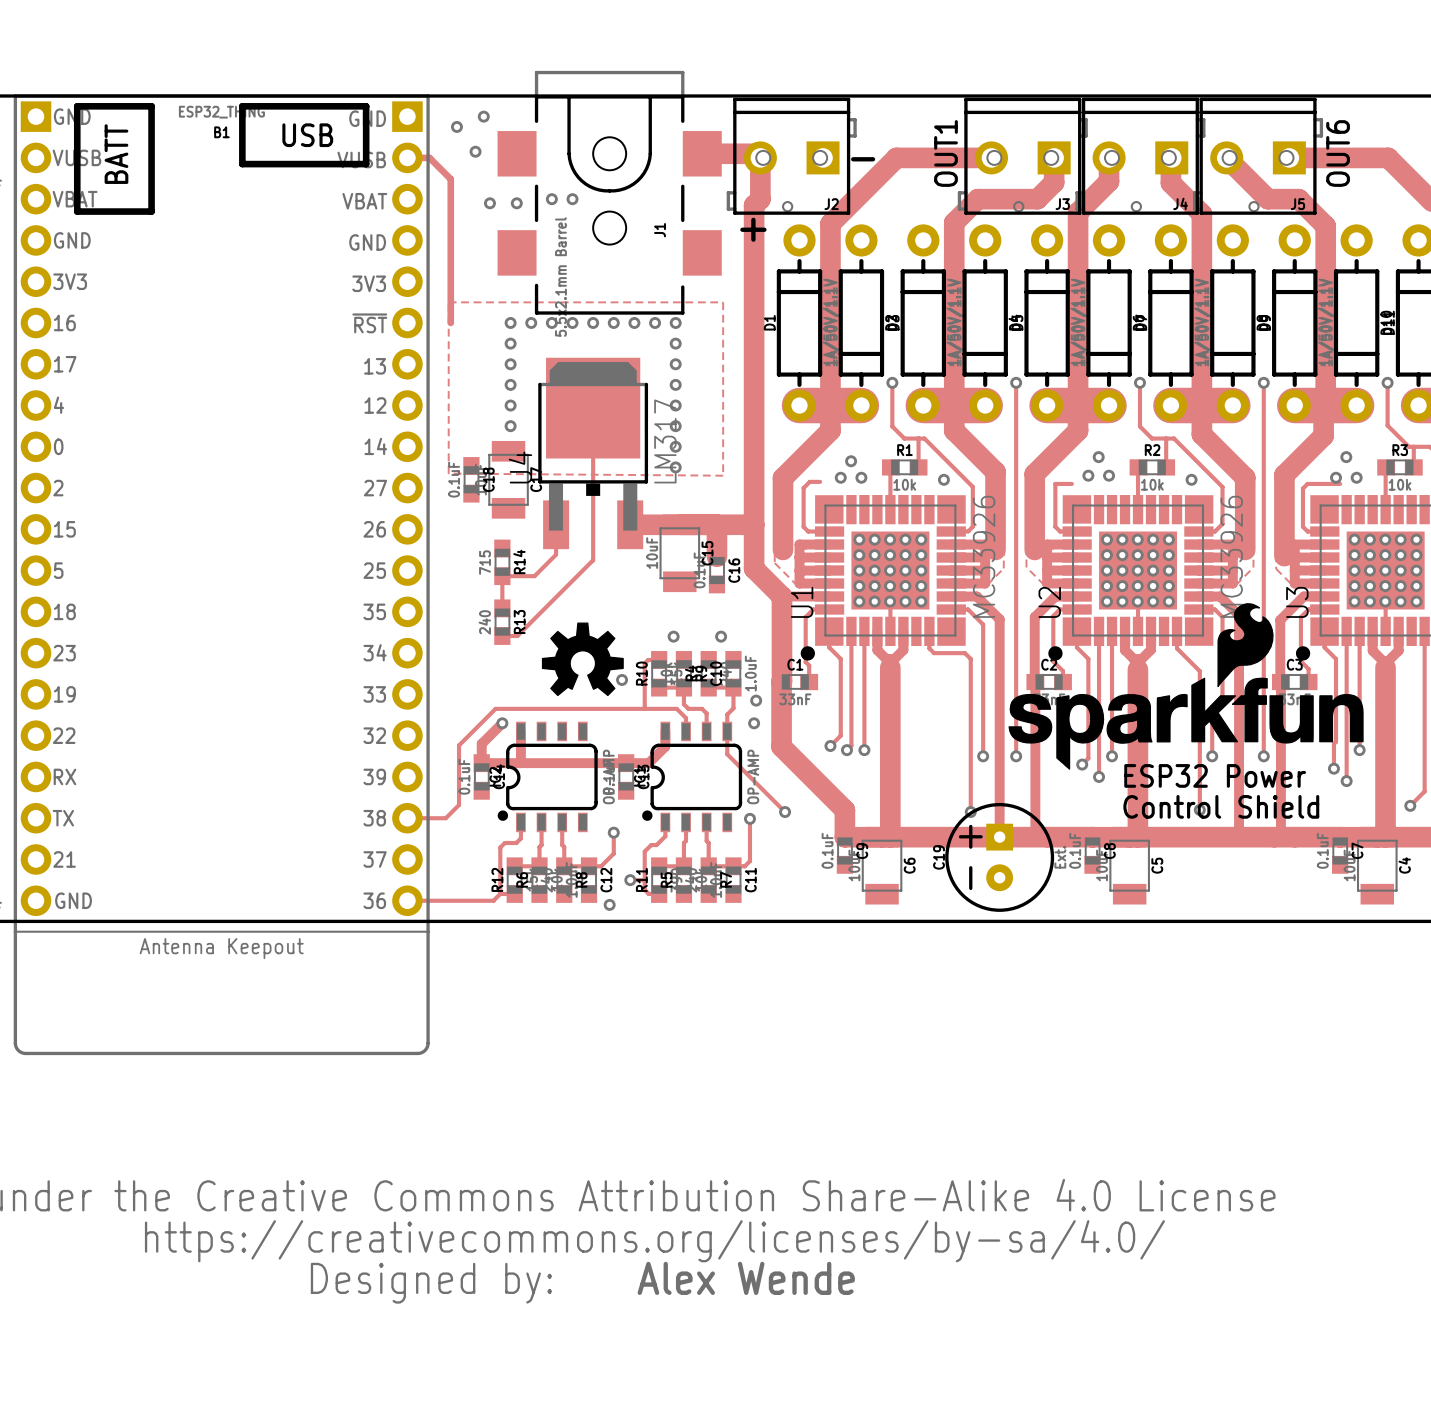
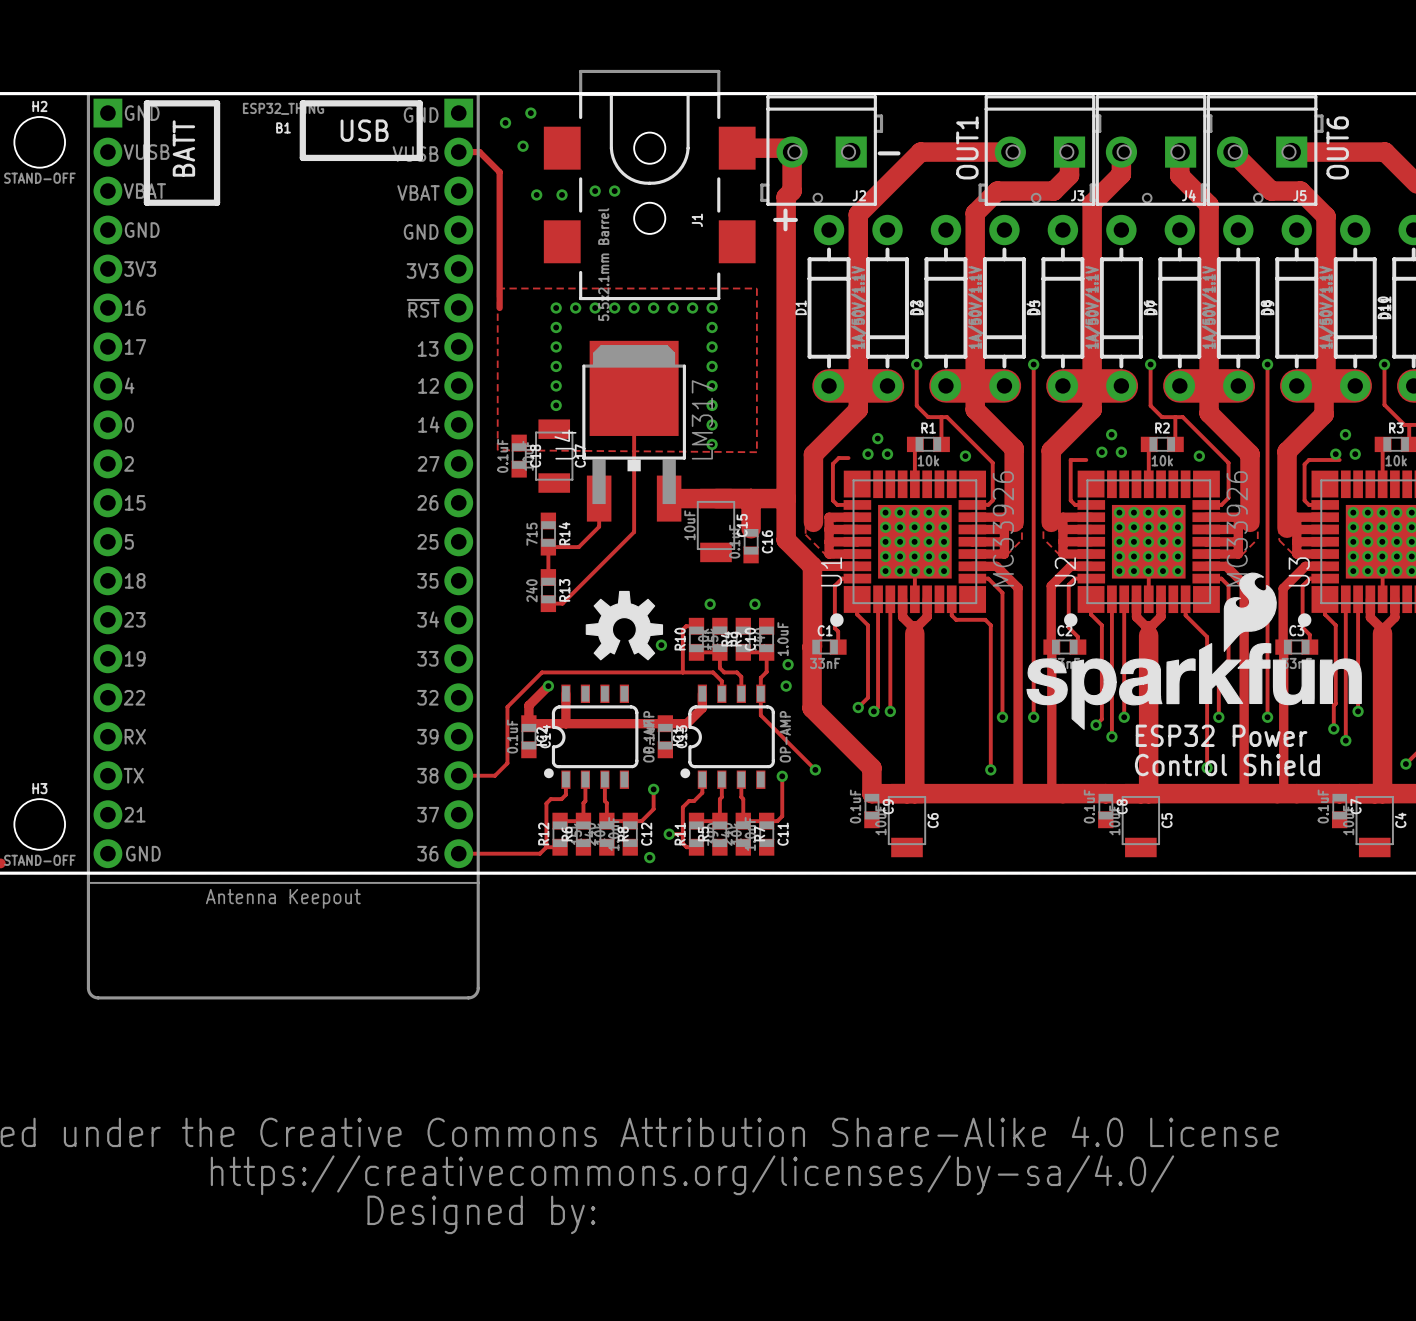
C19: Ext. (999, 857) -> none
text: Alex Wende (746, 1278) -> none

